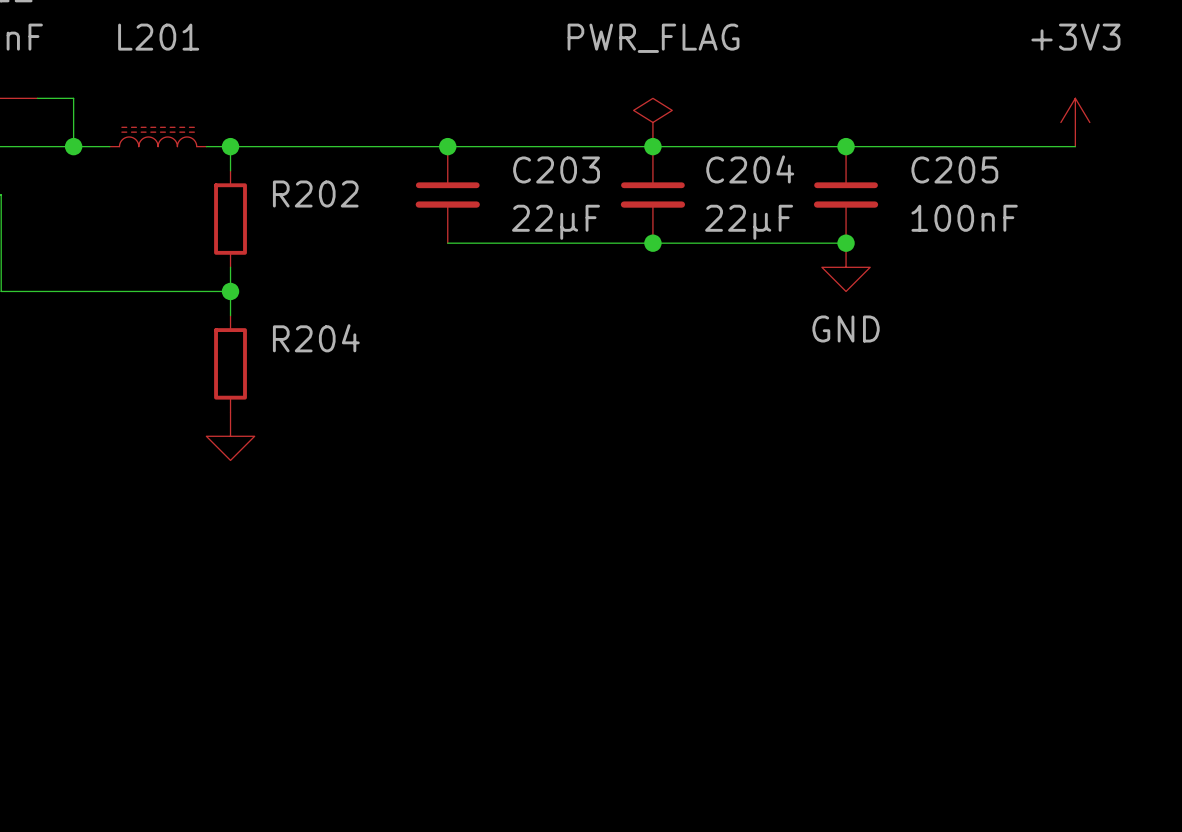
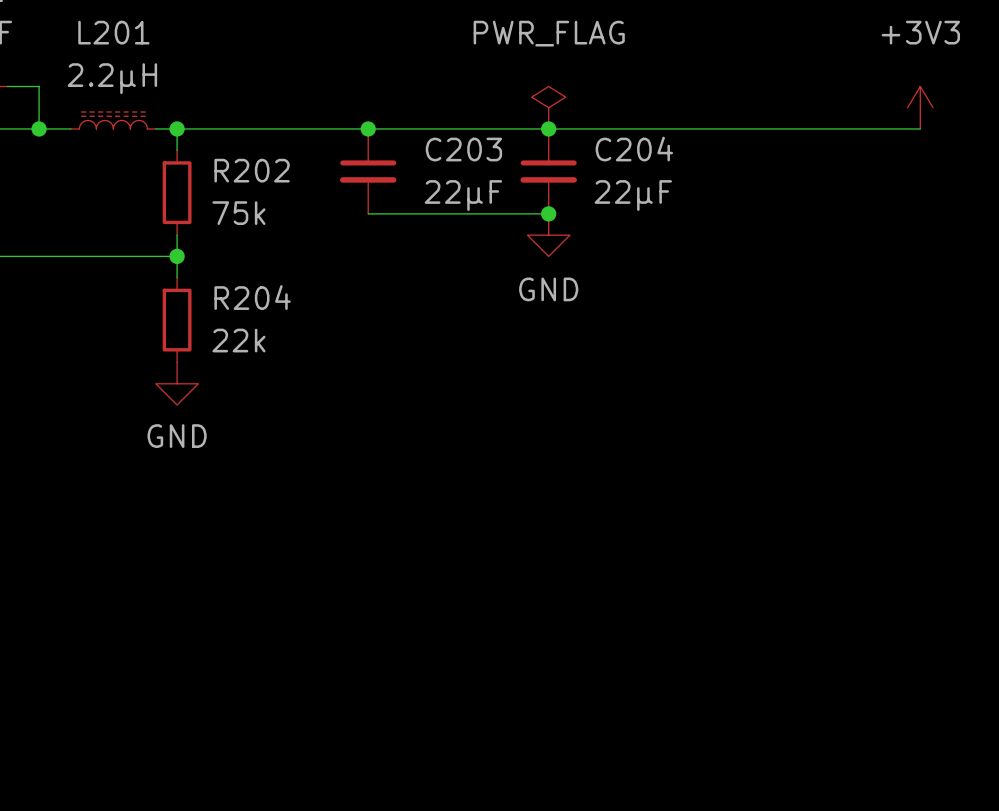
L201 value: none -> 2.2µH (112, 78)
junction: (846, 146) -> none
C205: 100nF (846, 194) -> none
R202 value: none -> 75k (238, 213)
wire: (652, 243) (846, 243) -> none
junction: (846, 243) -> none
power symbol position: GND (846, 267) -> GND (548, 235)
R204 value: none -> 22k (238, 340)
power symbol text: none -> GND (177, 436)

